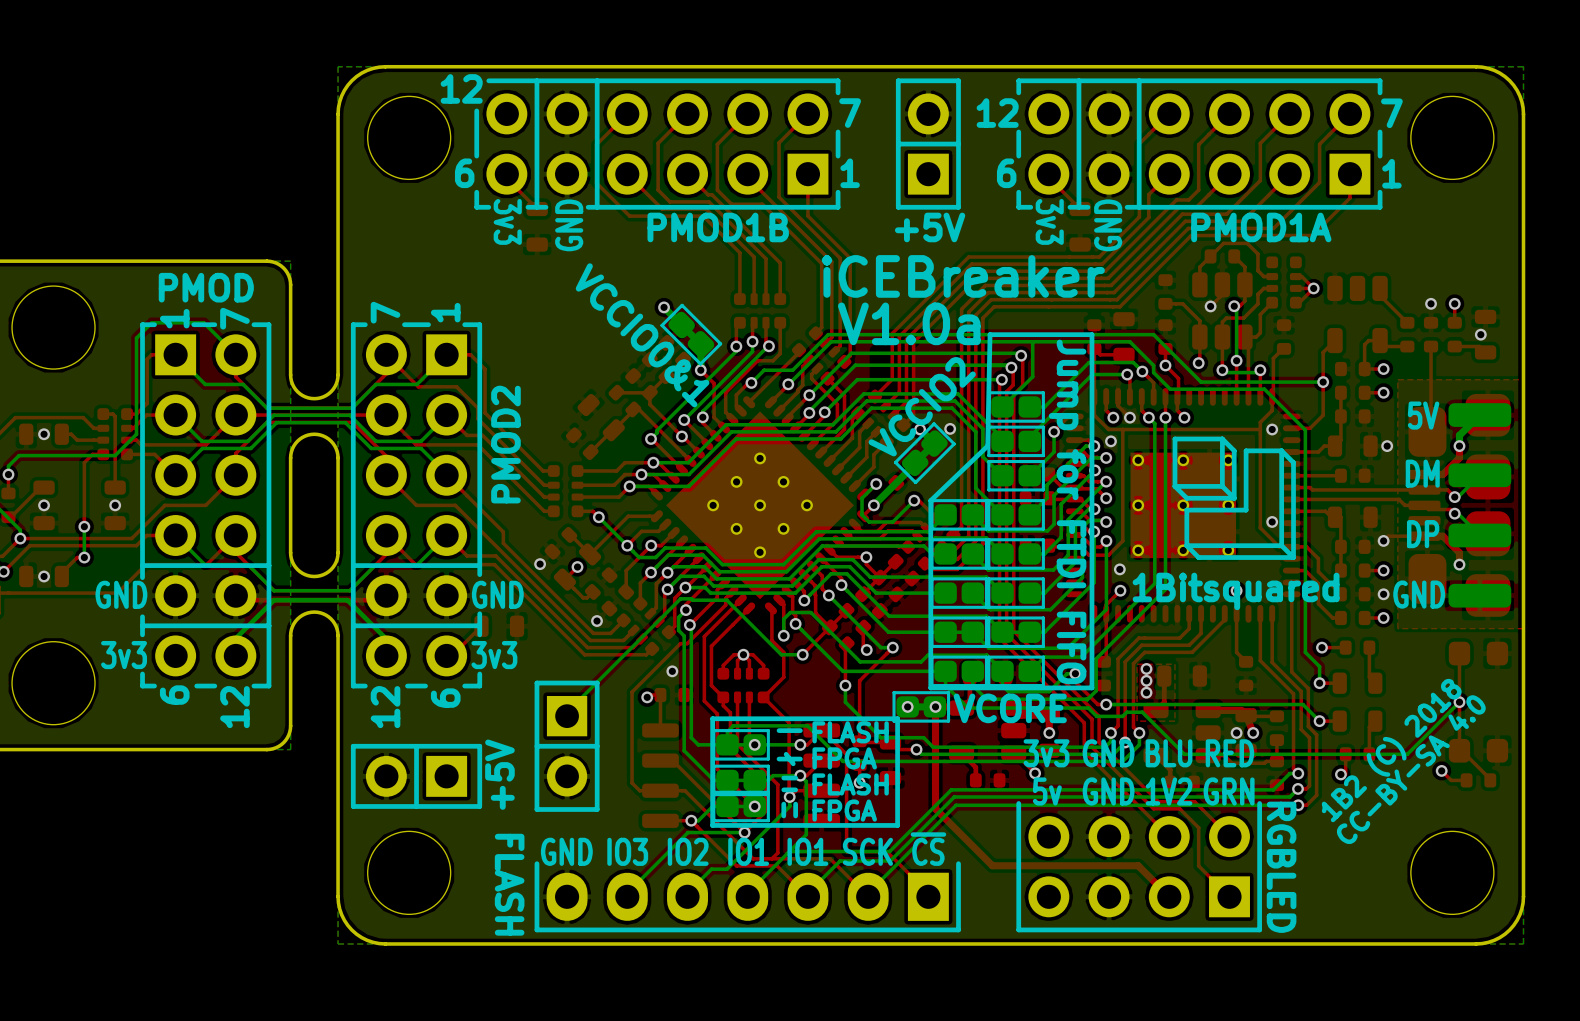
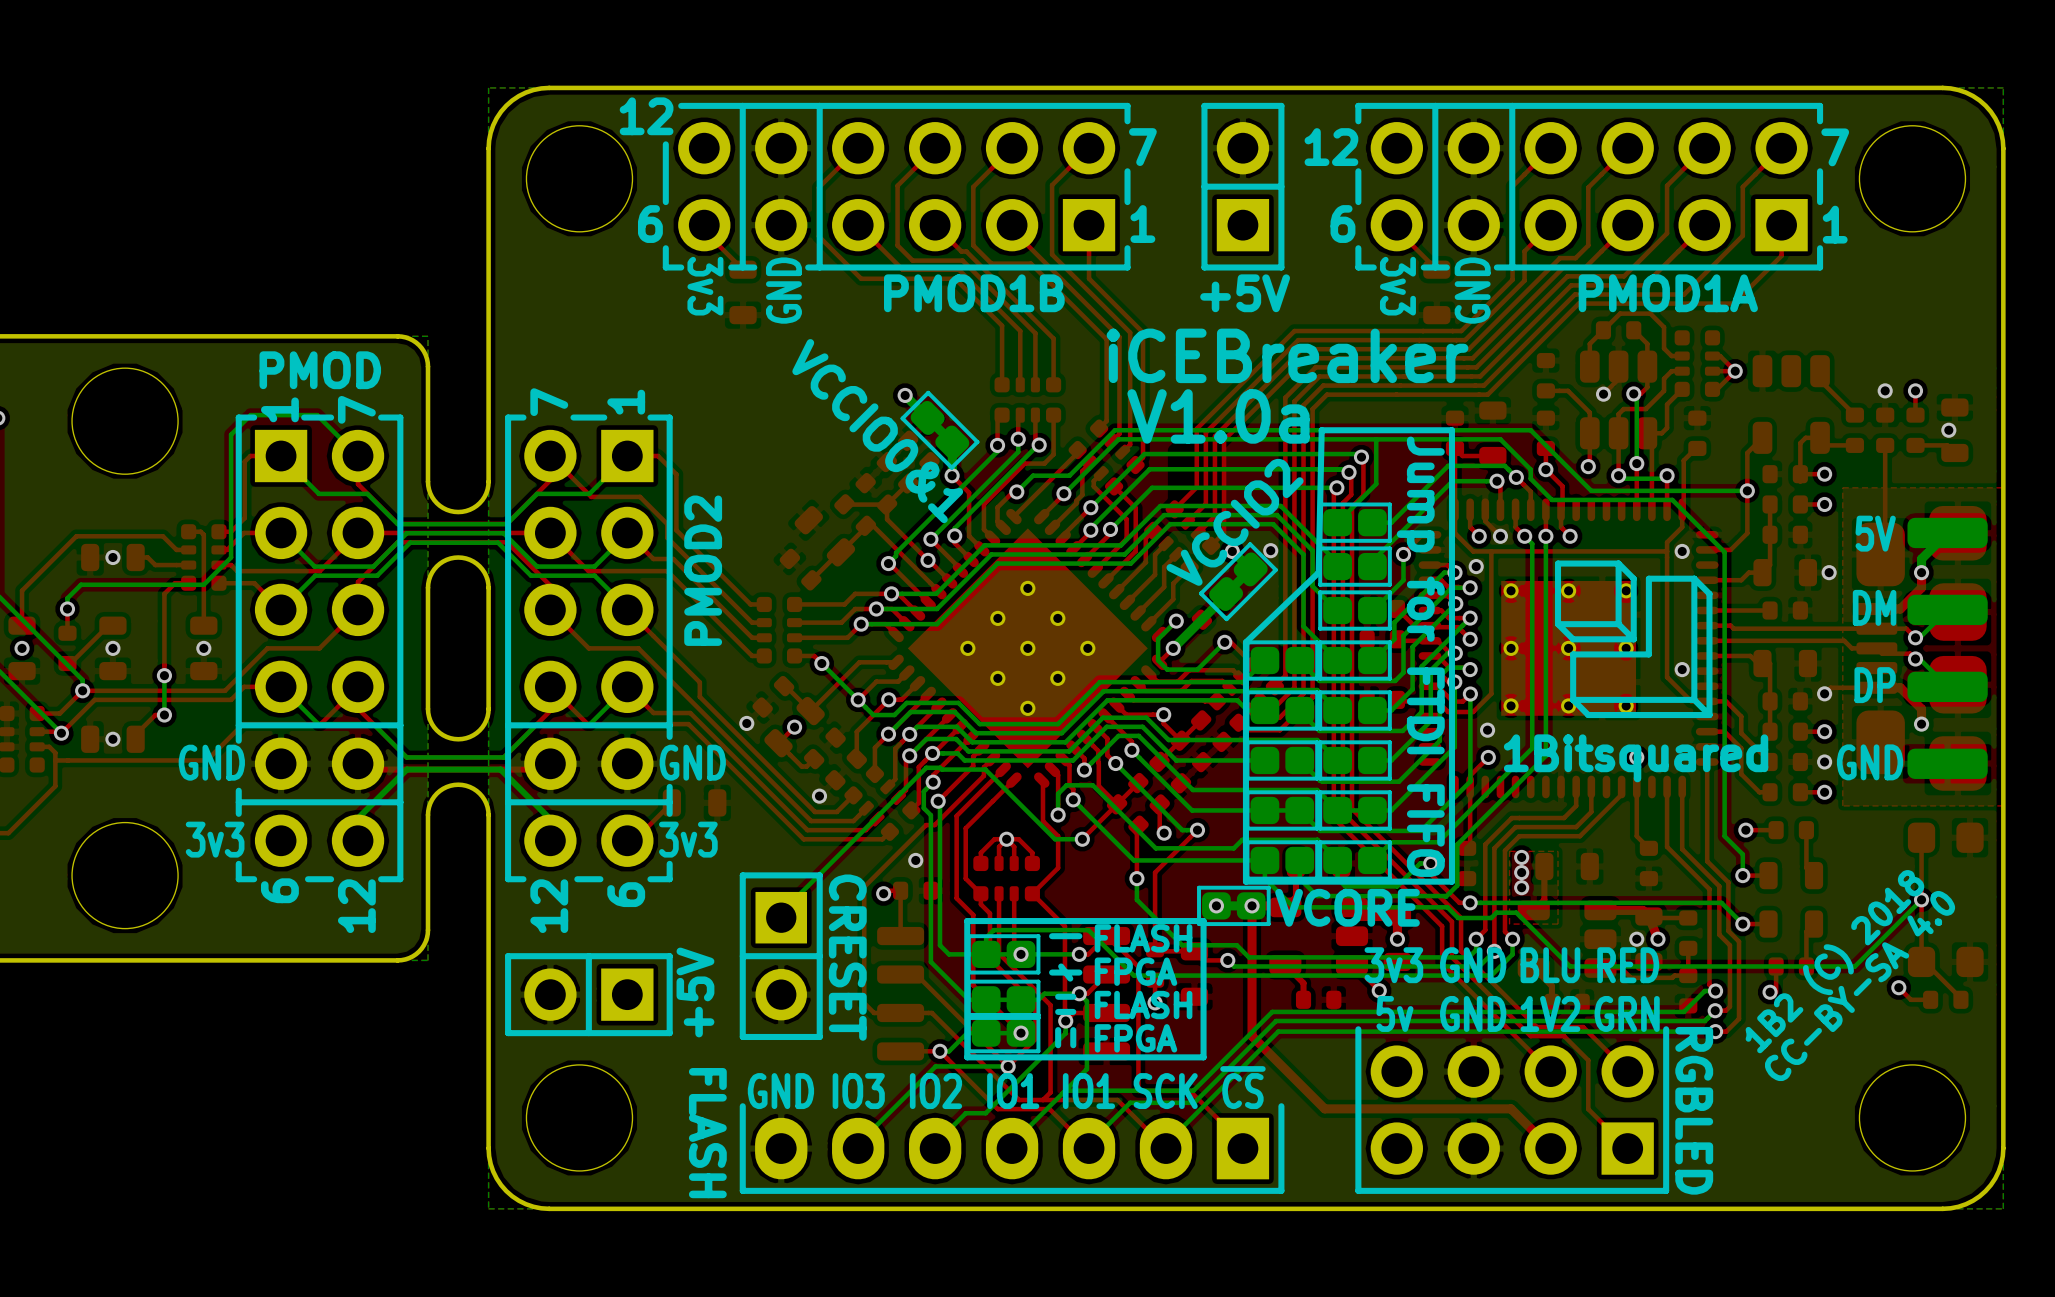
text: none -> CRESET (847, 957)

